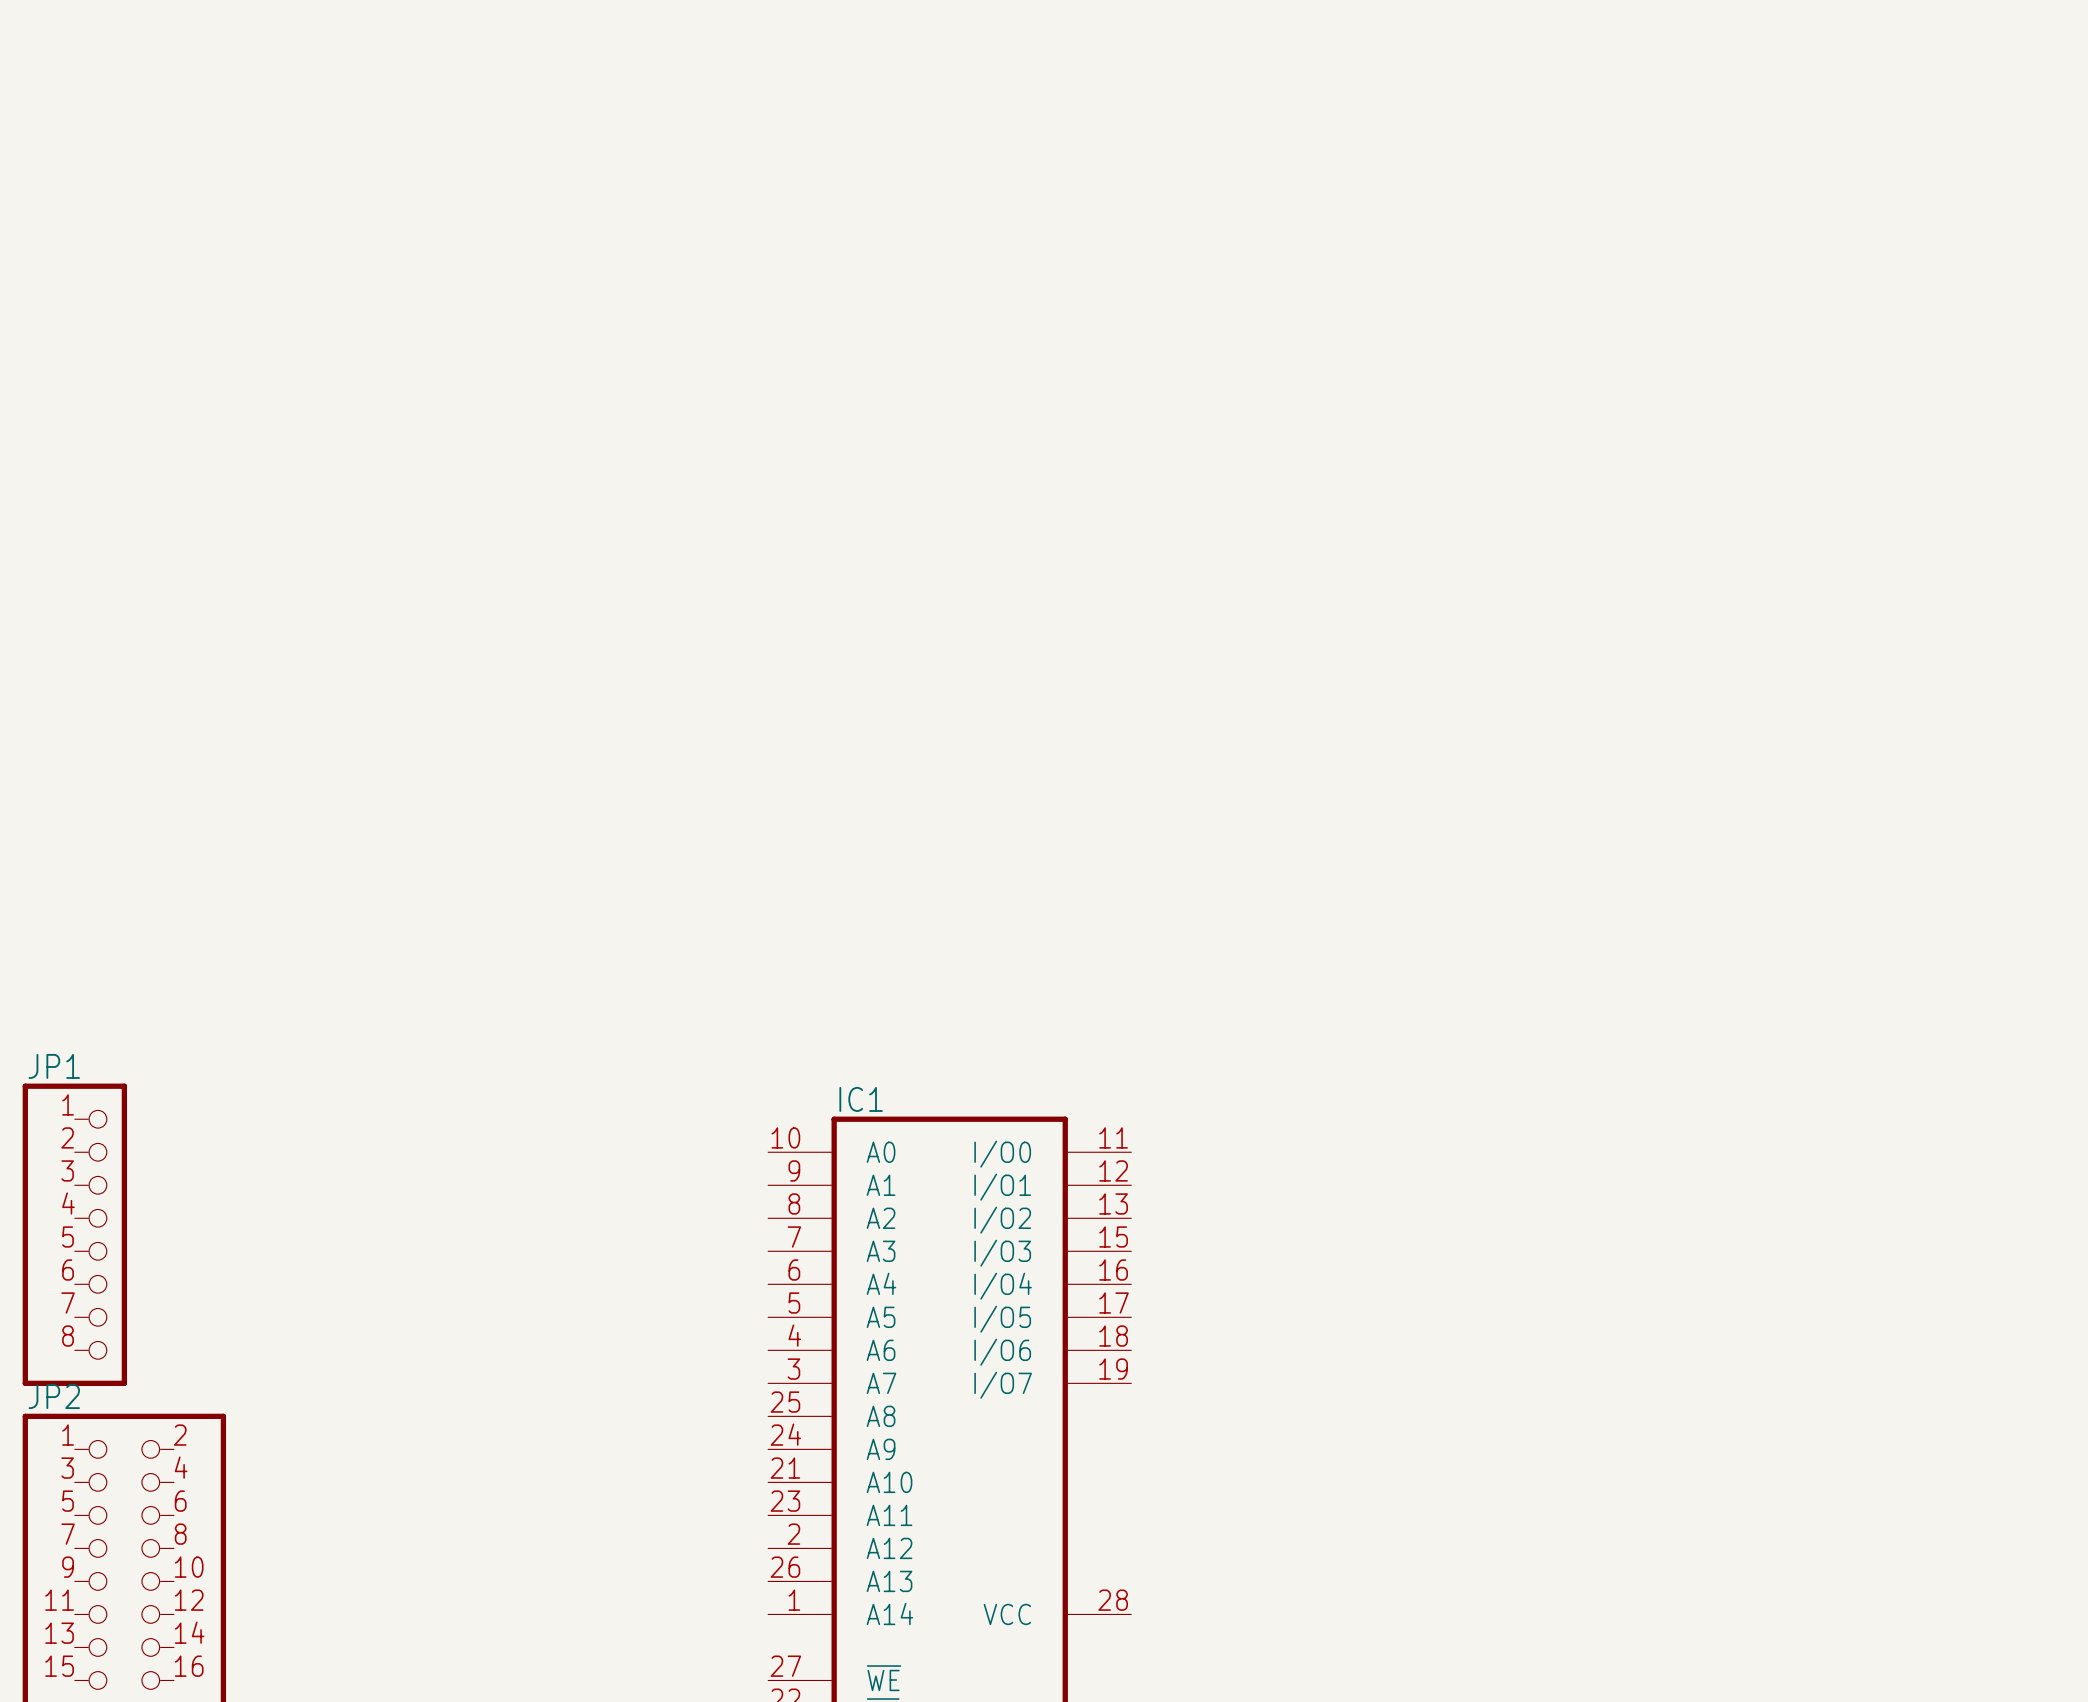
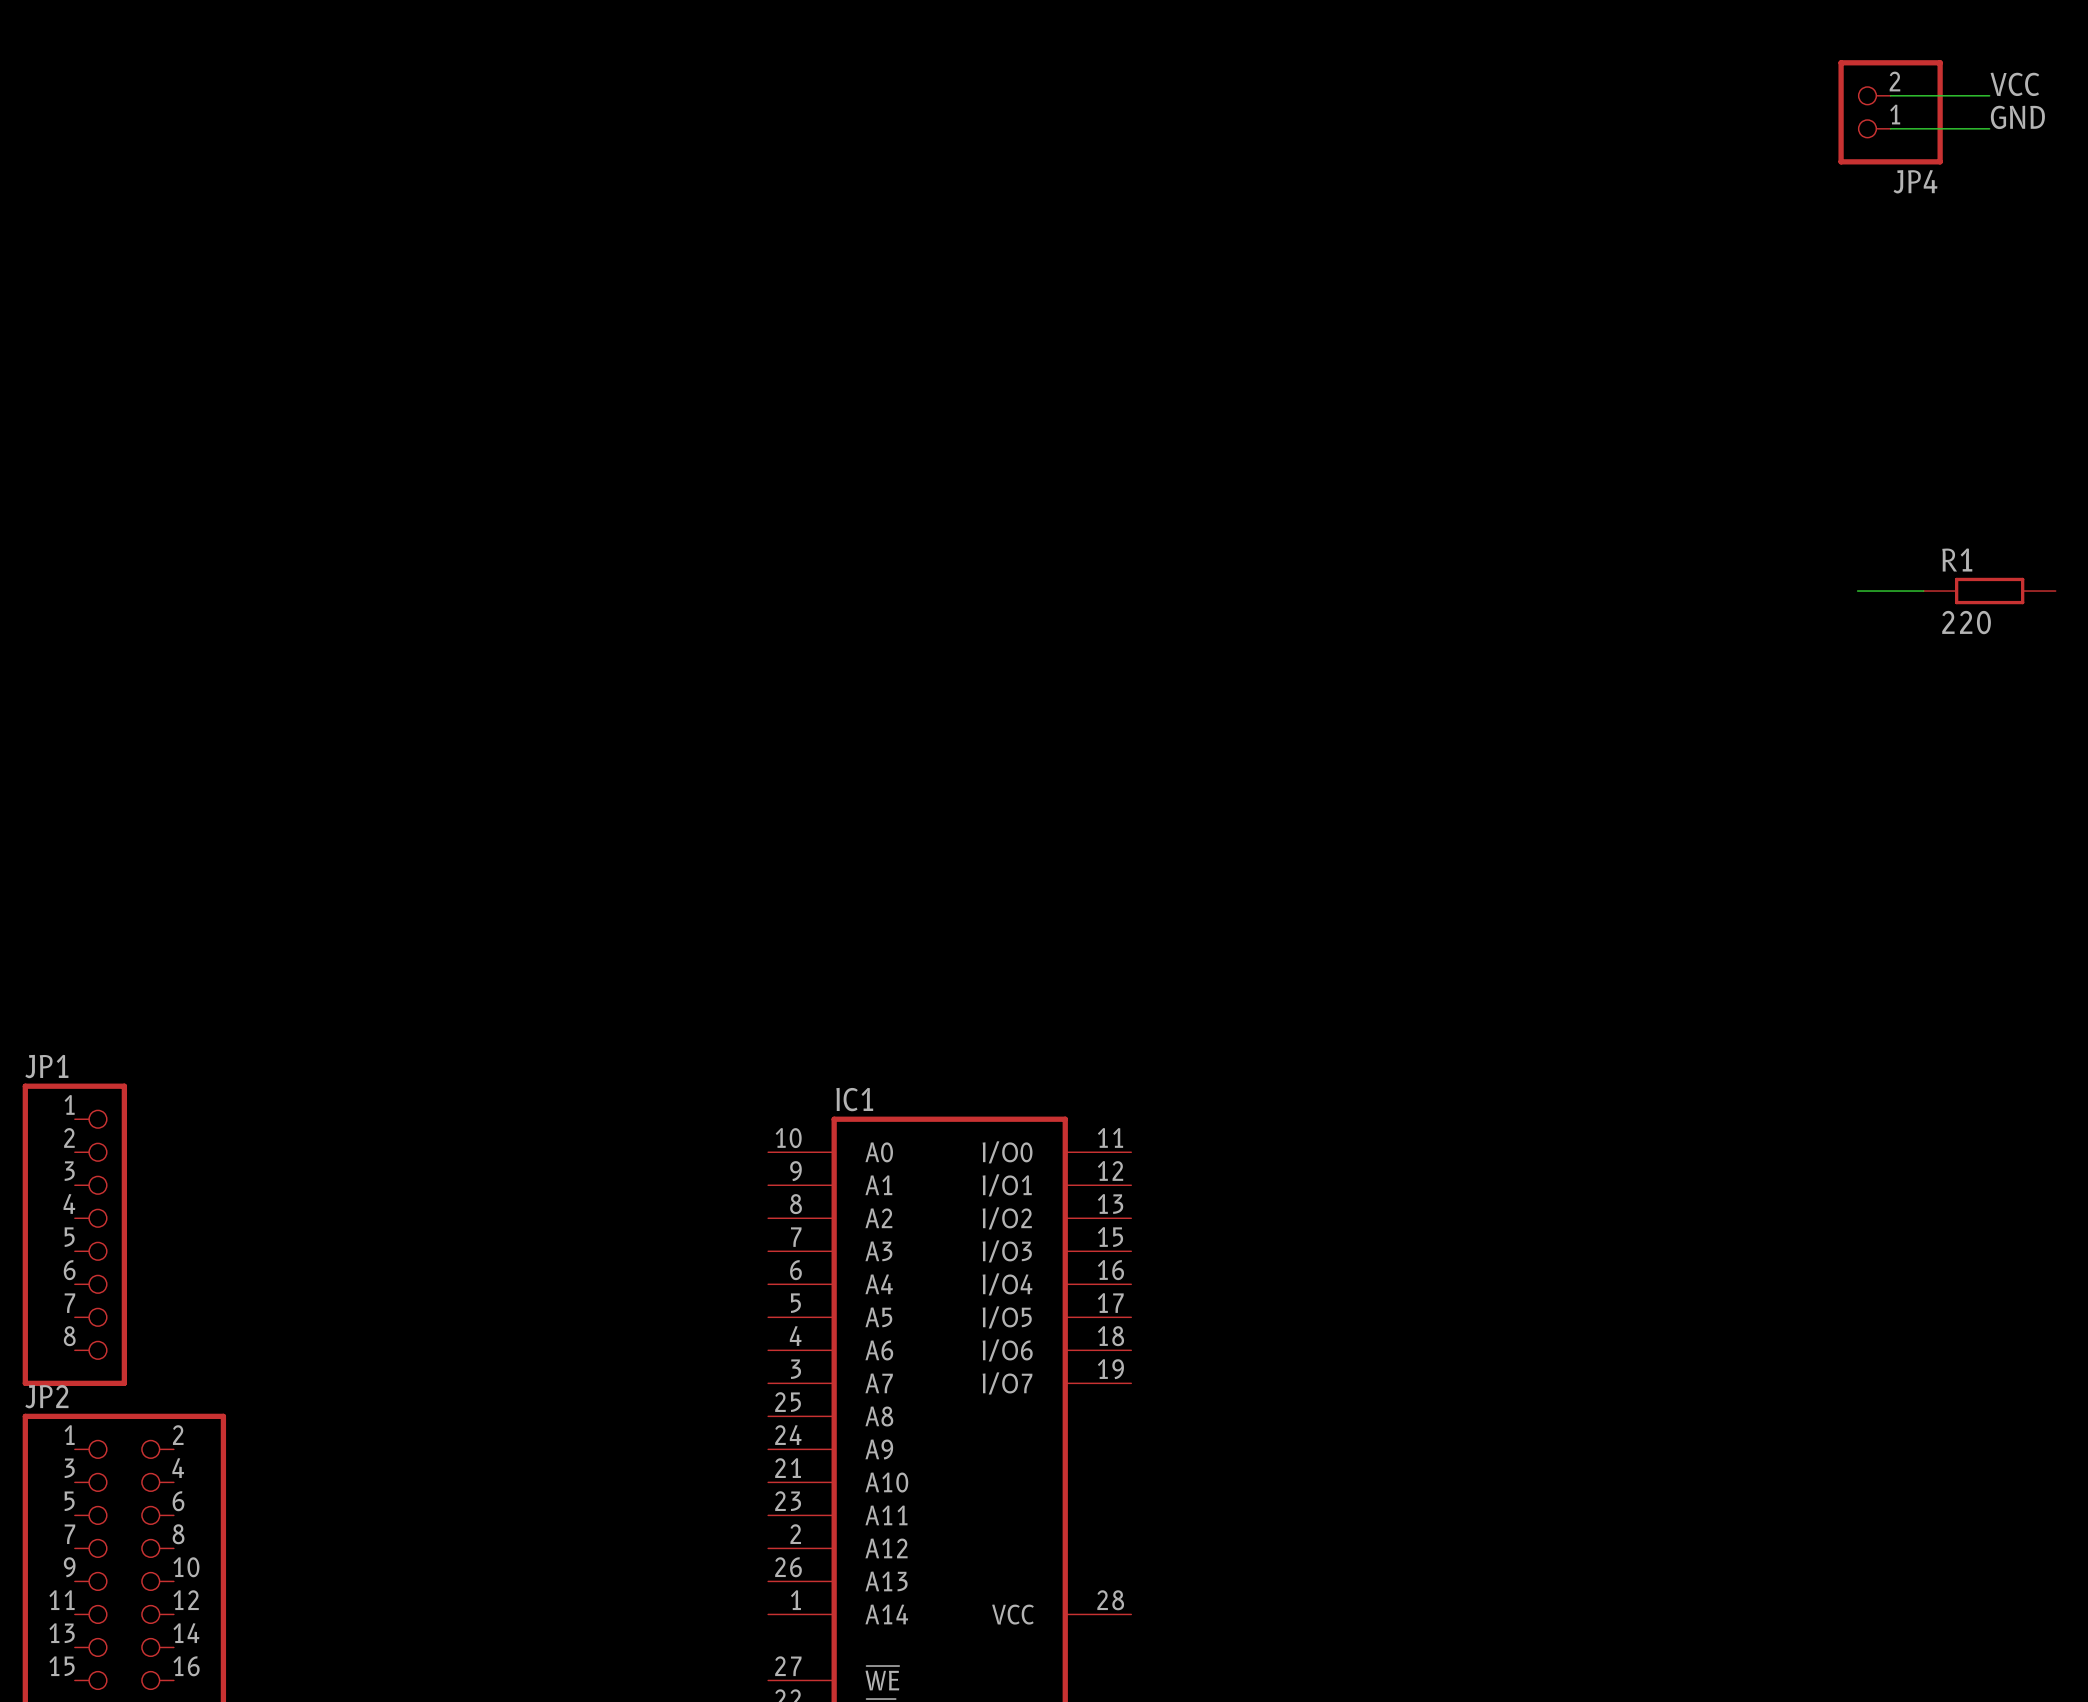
label: none -> VCC (2014, 84)
wire: none -> (1890, 95) (1989, 95)
JP4: none -> (1890, 112)
label: none -> GND (2017, 117)
wire: none -> (1890, 128) (1989, 128)
wire: none -> (1857, 591) (1923, 591)
R1: none -> 220 (1989, 591)

